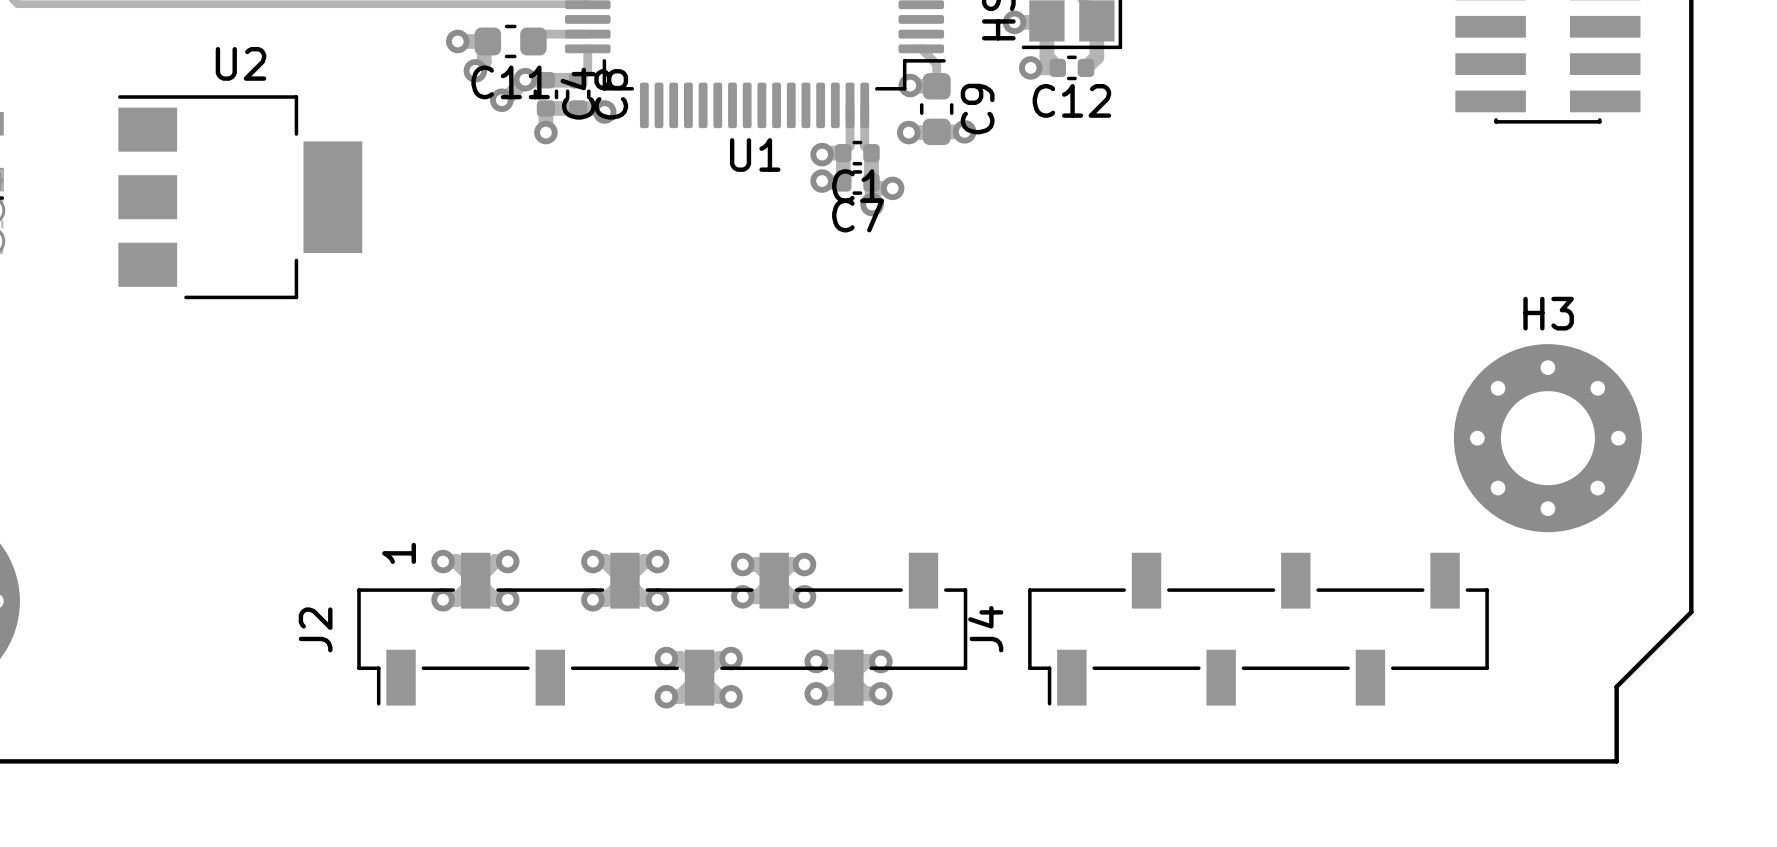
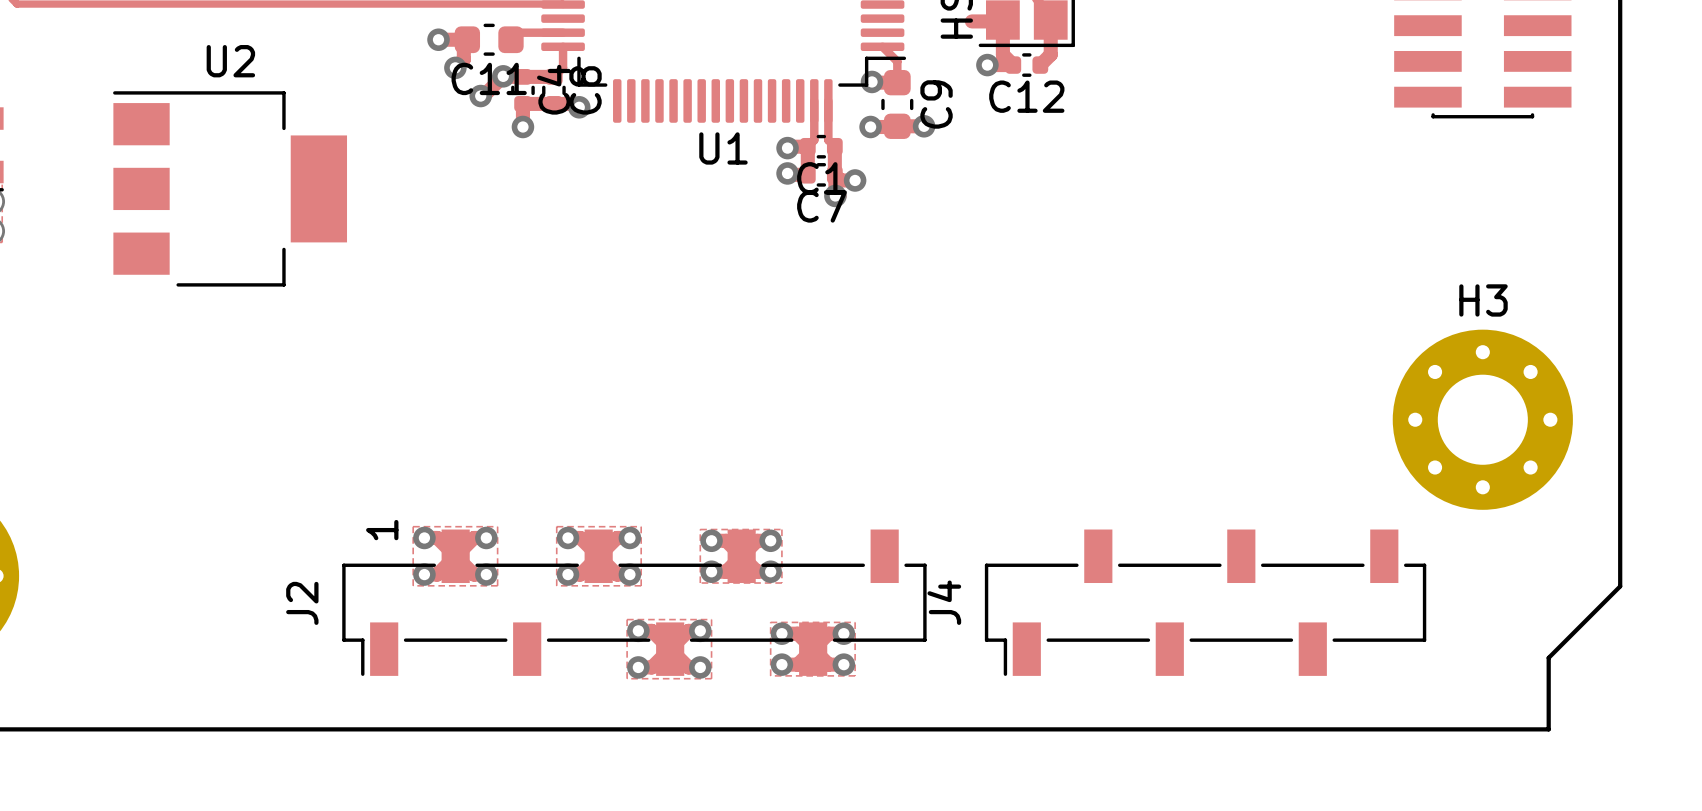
via: (1014, 22) -> none
zone outline: none -> (413, 526) (497, 526) (497, 585) (413, 585) (413, 526)
zone outline: none -> (556, 526) (556, 585) (641, 585) (641, 526) (556, 526)
zone outline: none -> (700, 529) (700, 583) (781, 583) (781, 529) (700, 529)
zone outline: none -> (627, 619) (627, 678) (711, 678) (711, 619) (627, 619)
zone outline: none -> (770, 622) (770, 675) (855, 675) (855, 622) (770, 622)

